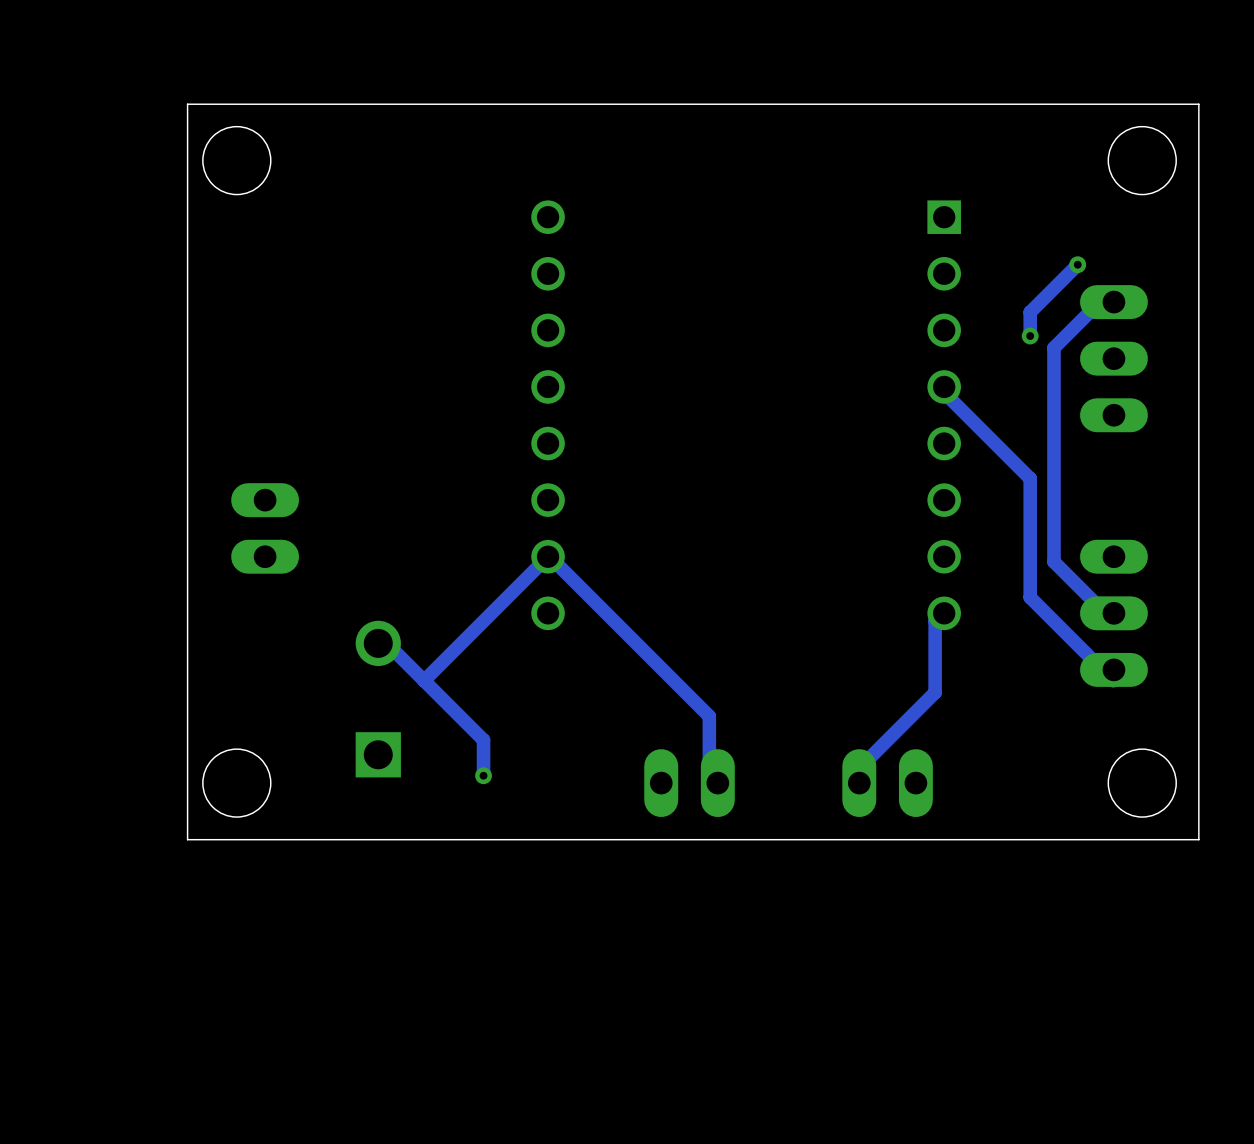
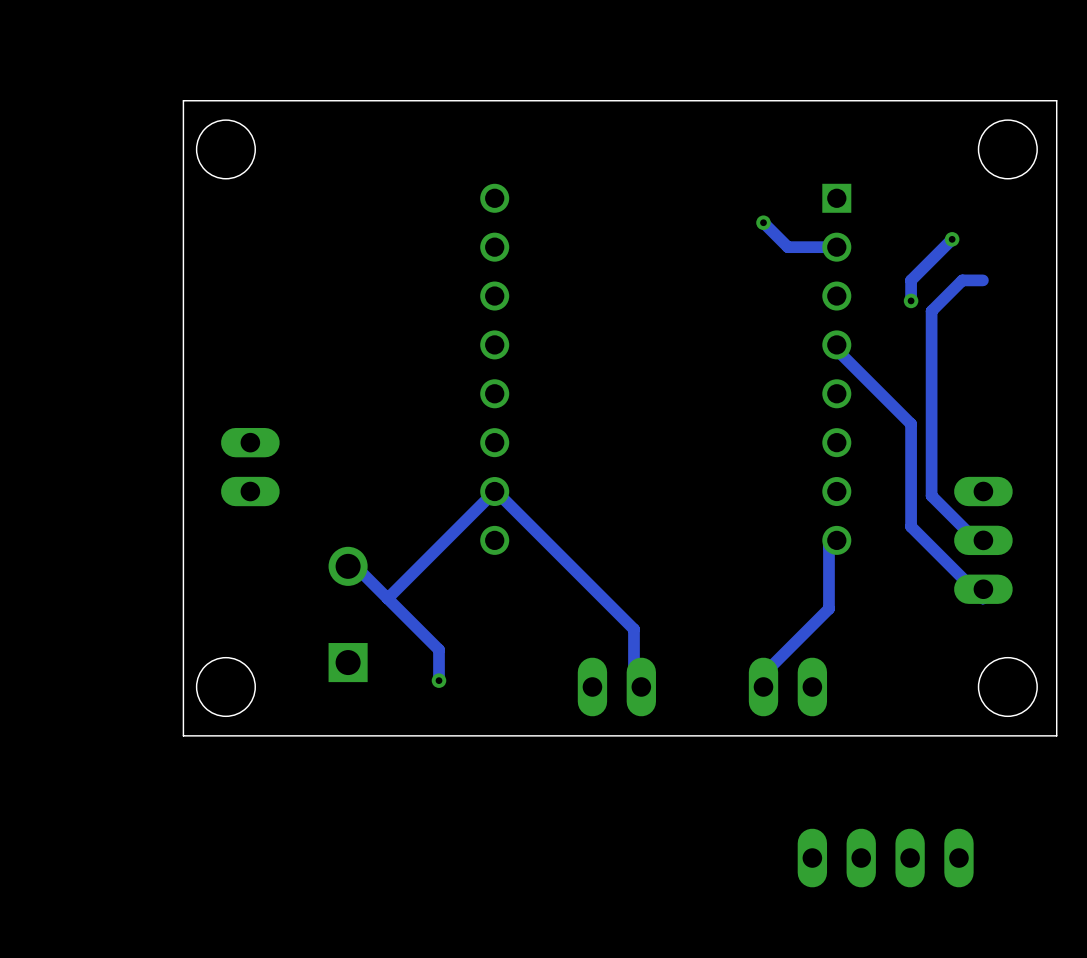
track: none -> (763, 222) (787, 247) (836, 247)
via: none -> (763, 222)
part: (1113, 358) -> none
part: none -> (885, 858)

